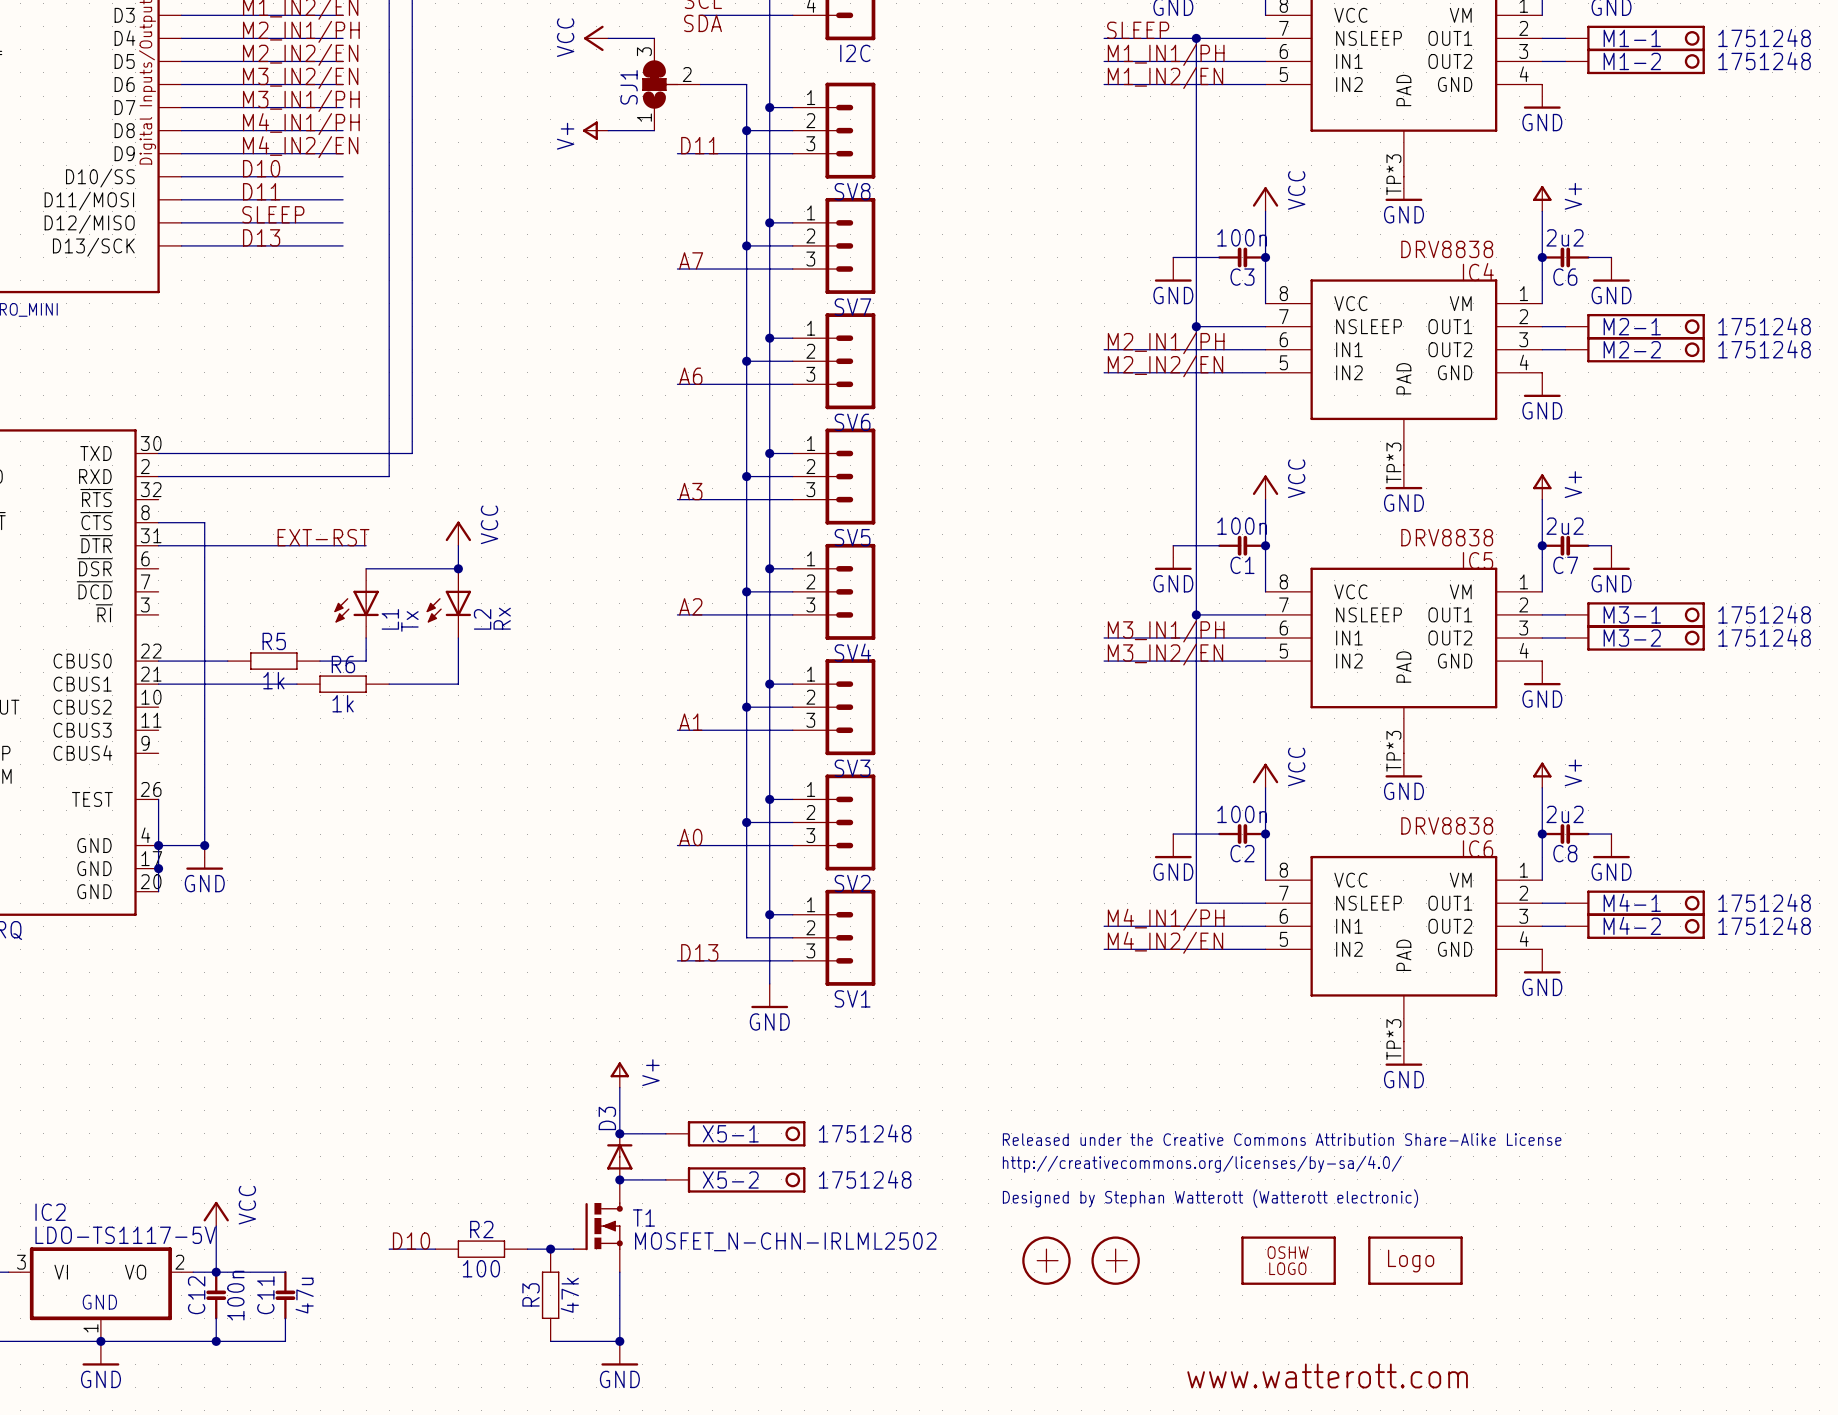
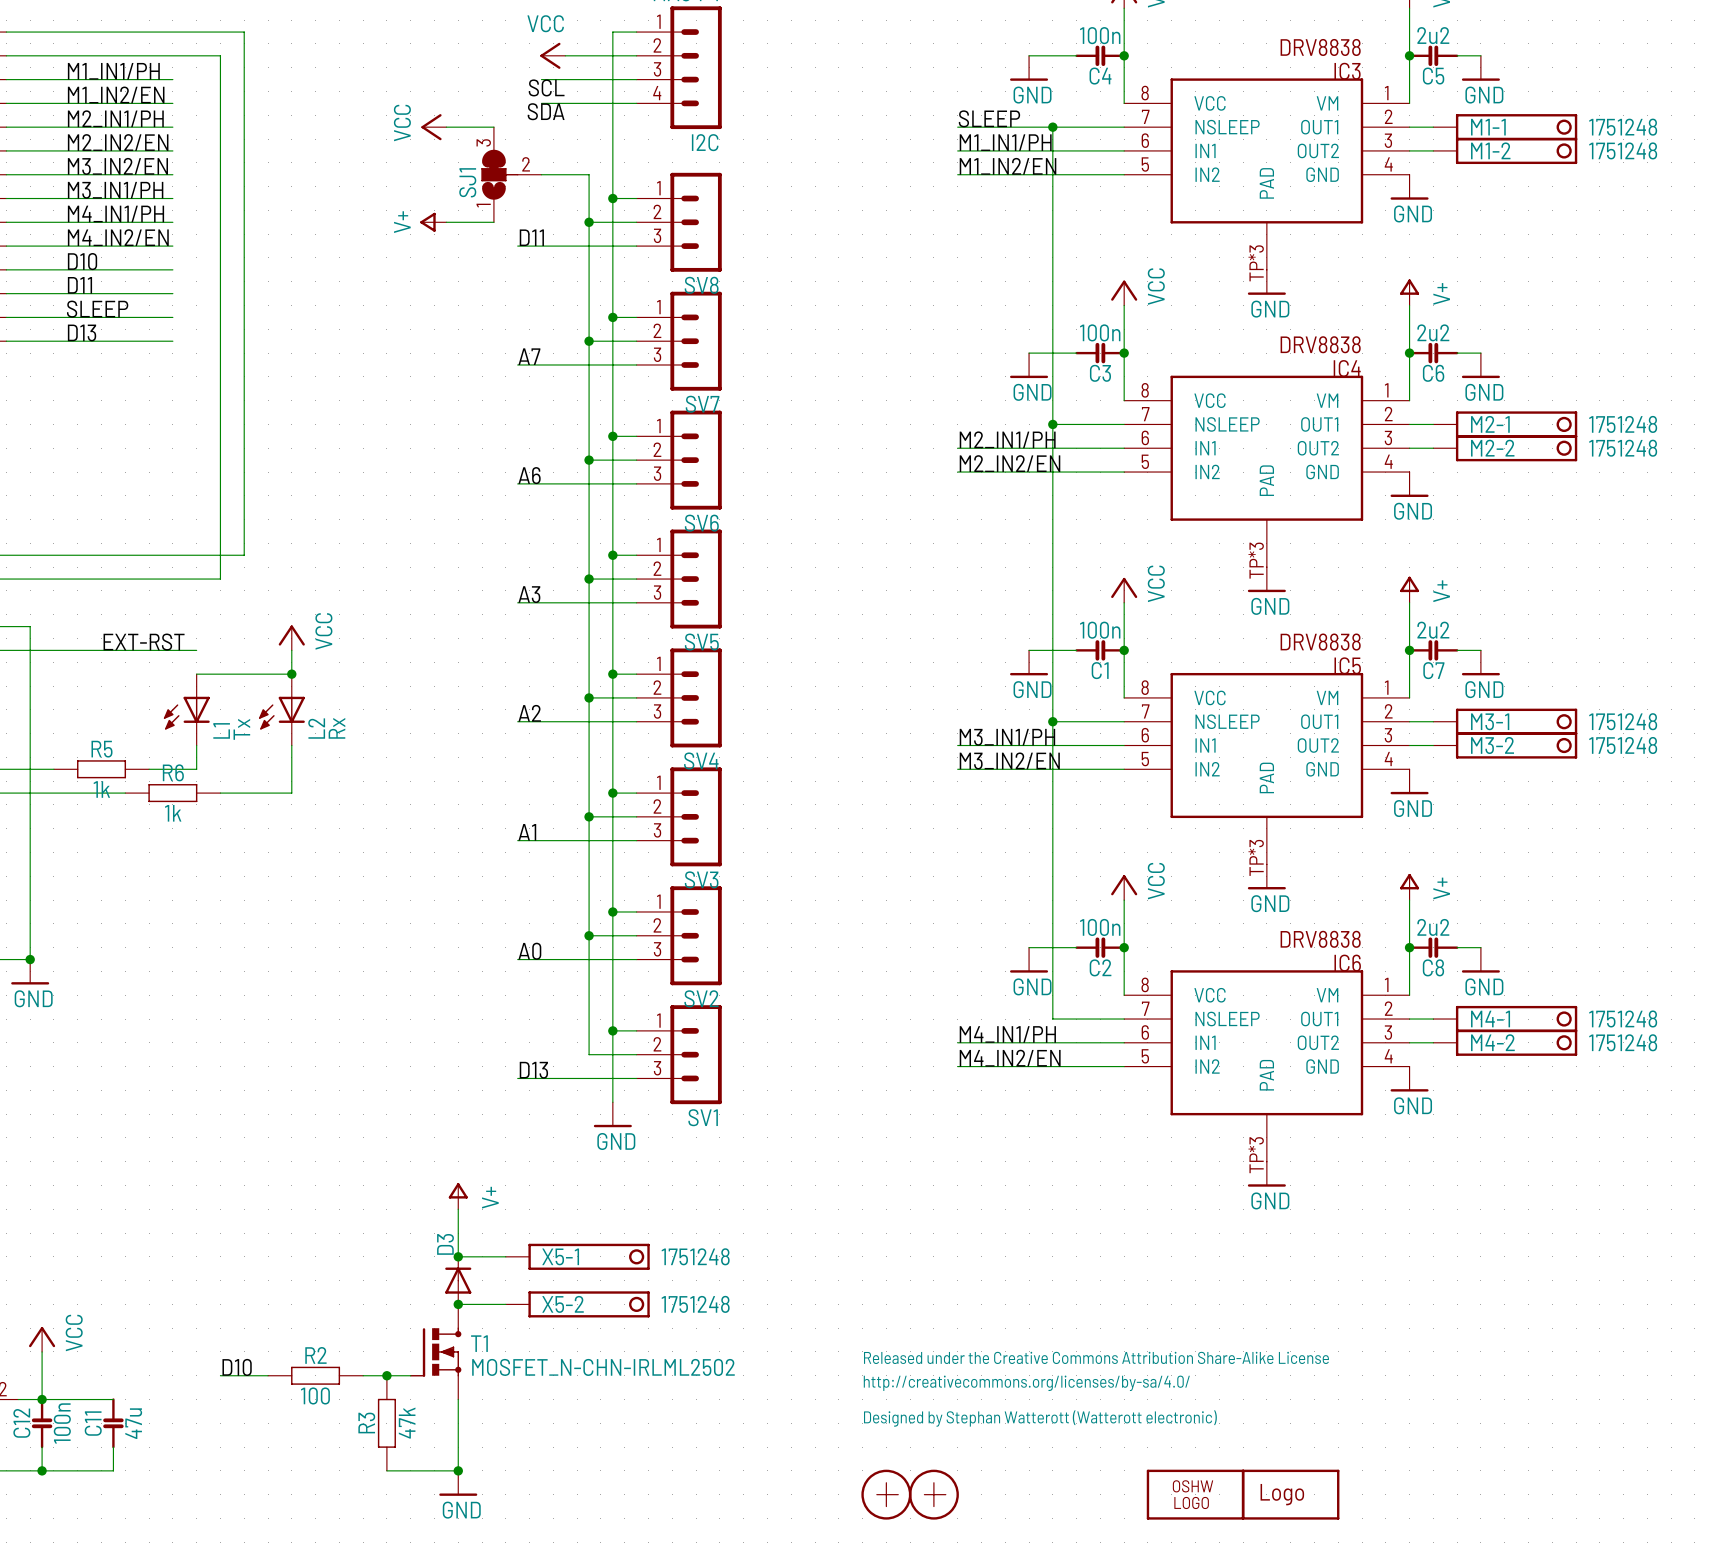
text position: Released under the Creative Commons Attribution Share-Alike License (1282, 1139) -> Released under the Creative Commons Attribution Share-Alike License (1096, 1357)
text position: http://creativecommons.org/licenses/by-sa/4.0/ (1202, 1164) -> http://creativecommons.org/licenses/by-sa/4.0/ (1026, 1383)
text position: Designed by Stephan Watterott (Watterott electronic) (1210, 1198) -> Designed by Stephan Watterott (Watterott electronic) (1040, 1418)
part: (1046, 1260) -> none
part: (1115, 1260) -> none
part position: (1288, 1260) -> (1195, 1494)
part position: (1415, 1260) -> (1290, 1494)
part: none -> (886, 1494)
part: none -> (933, 1494)
text: www.watterott.com (1327, 1375) -> none

